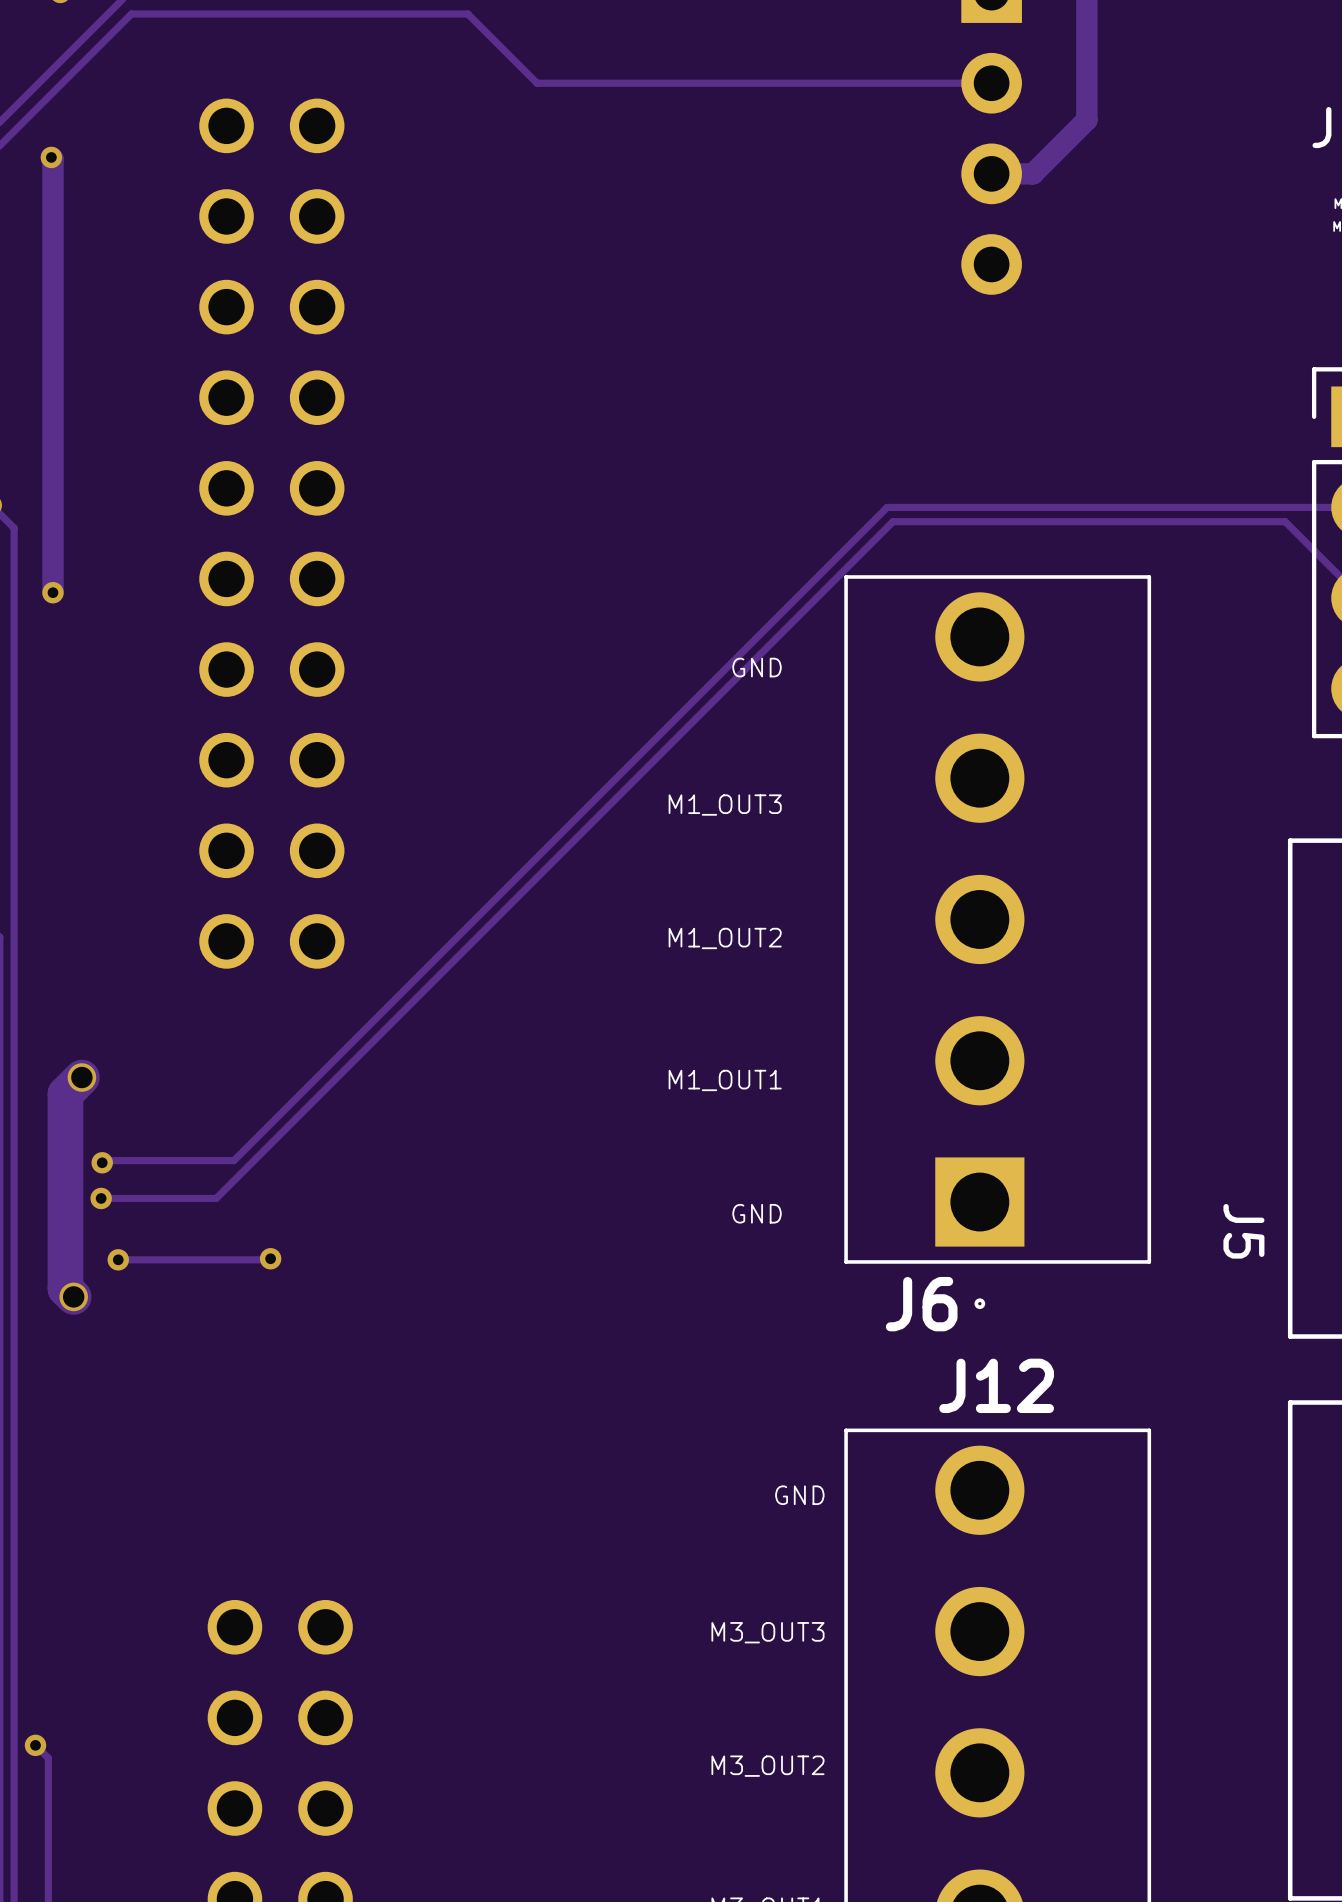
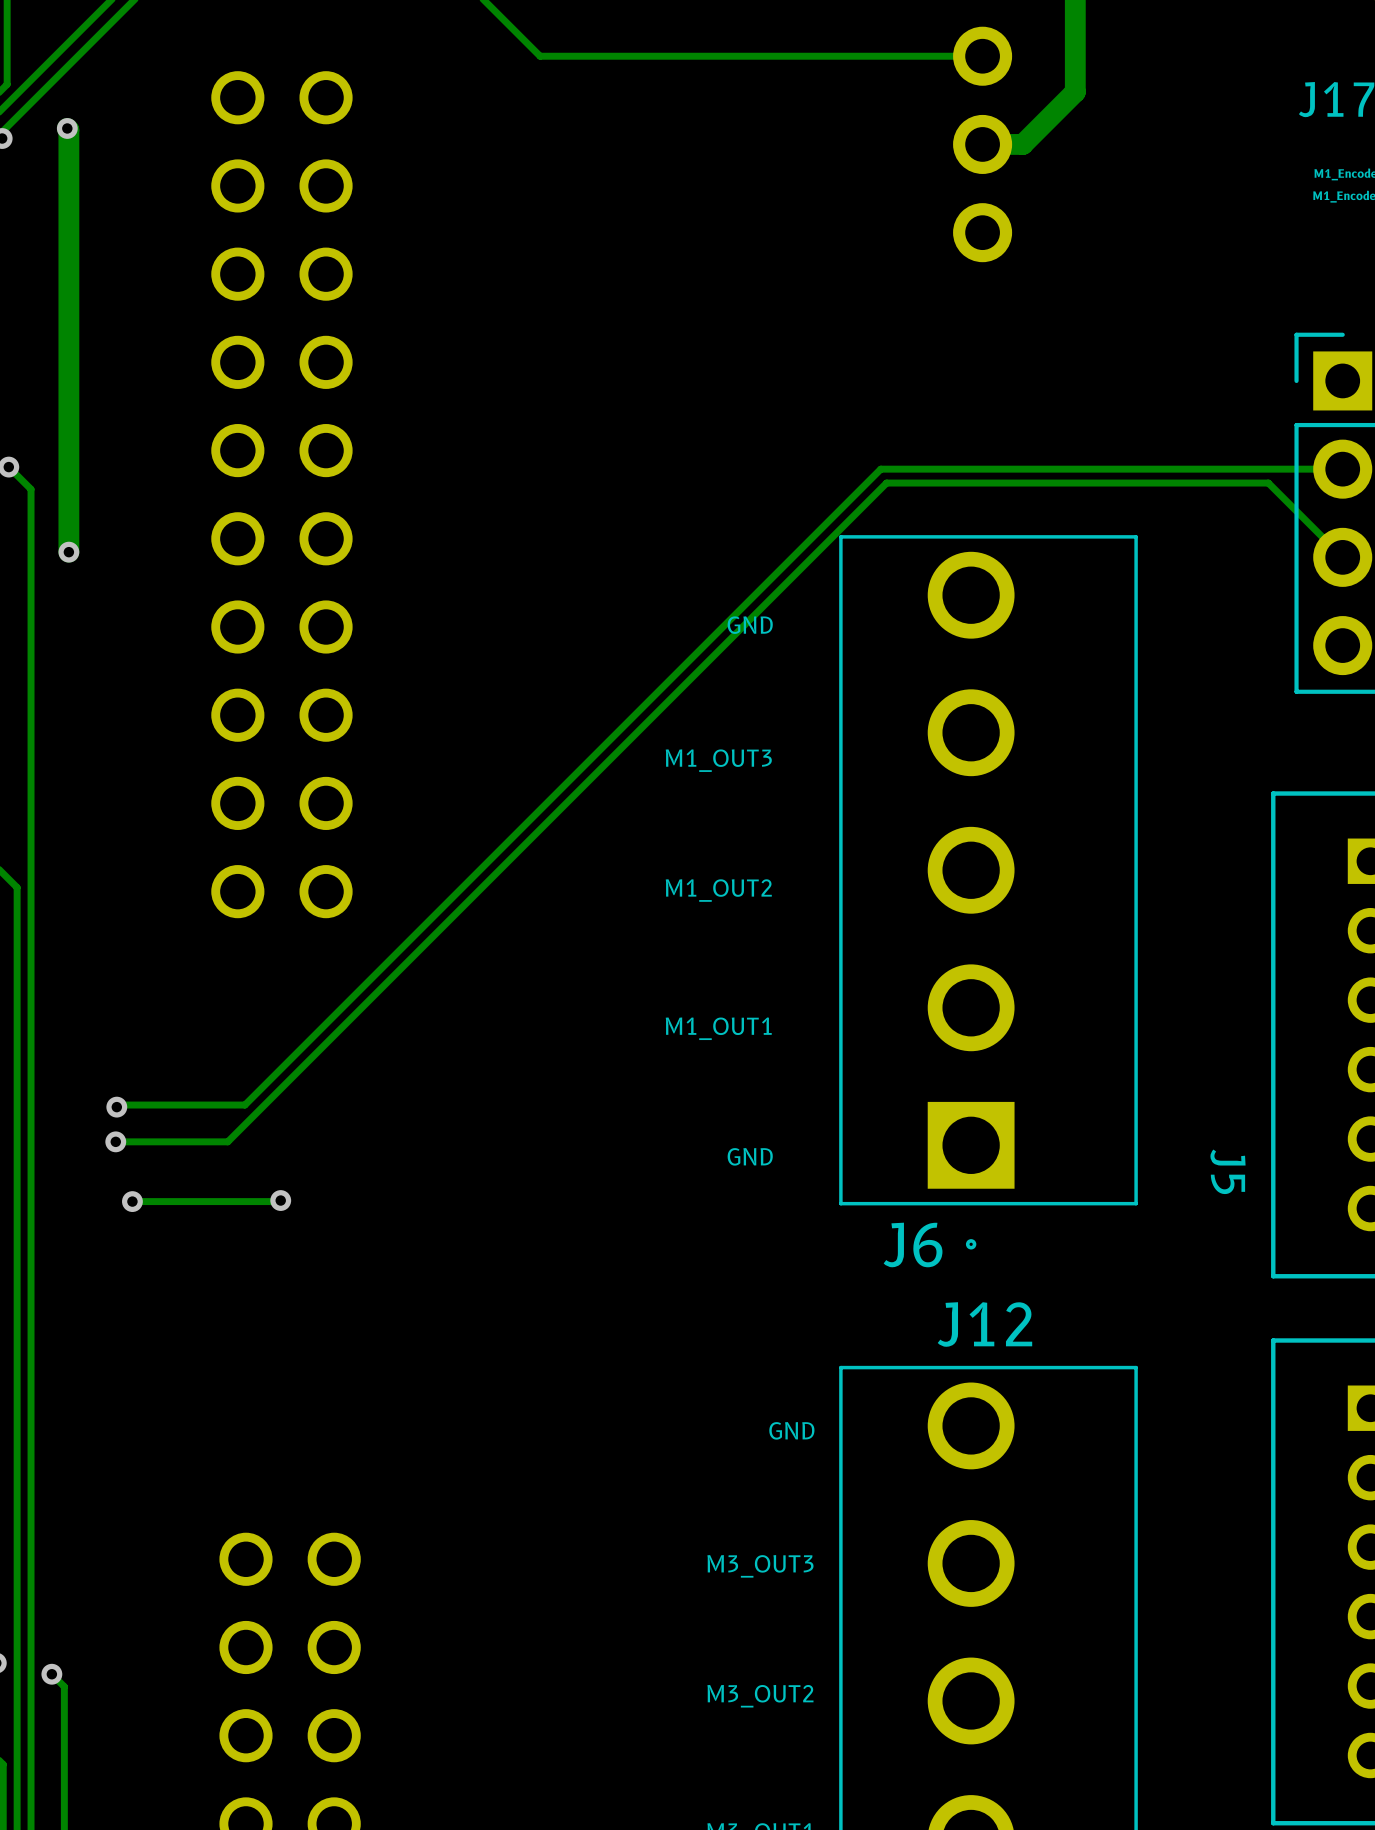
track: (81, 1077) (65, 1093) (65, 1288) (73, 1296) -> none
via: (81, 1077) -> none
via: (73, 1296) -> none

